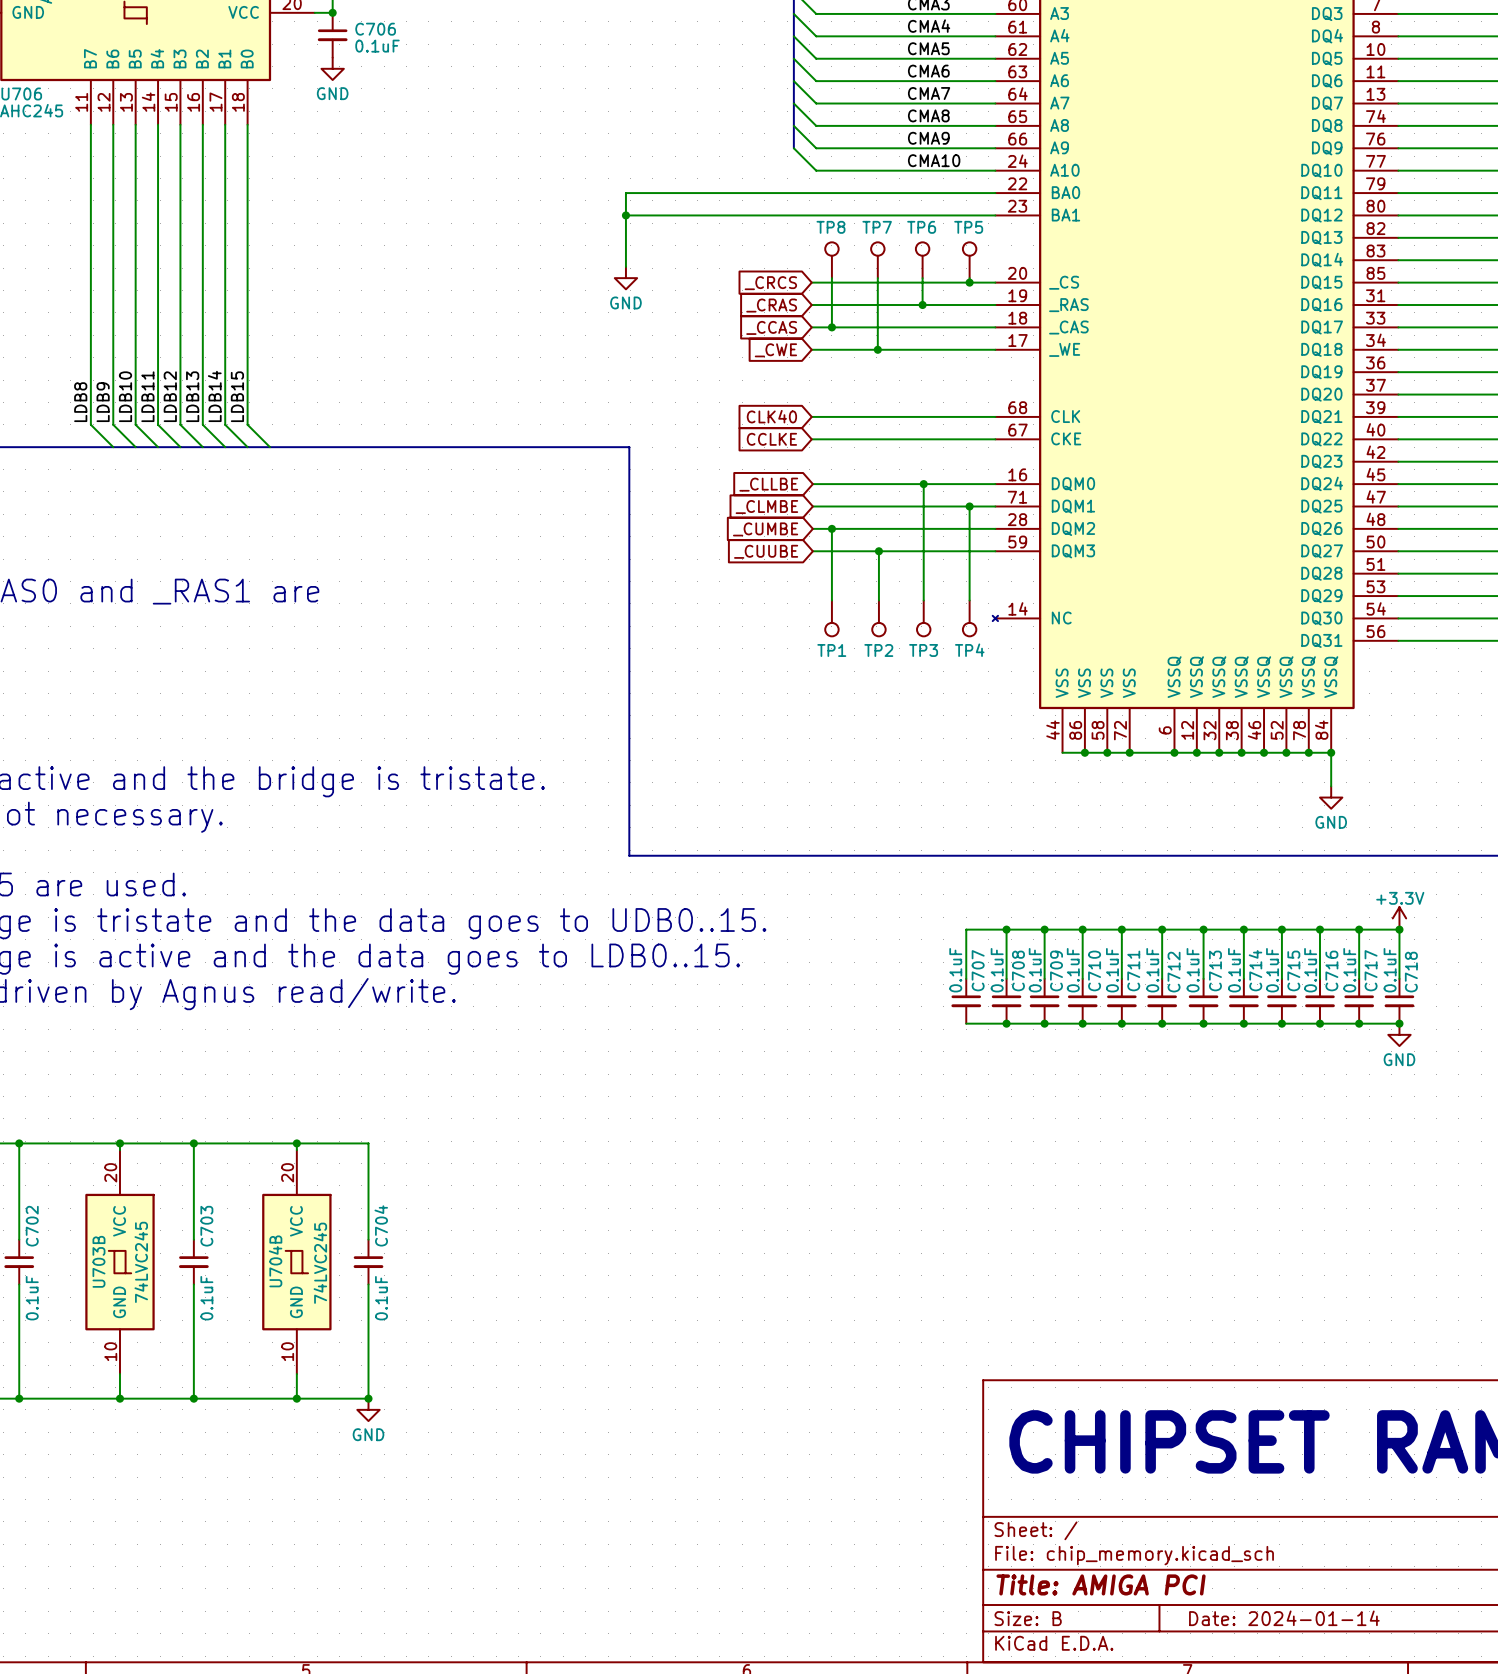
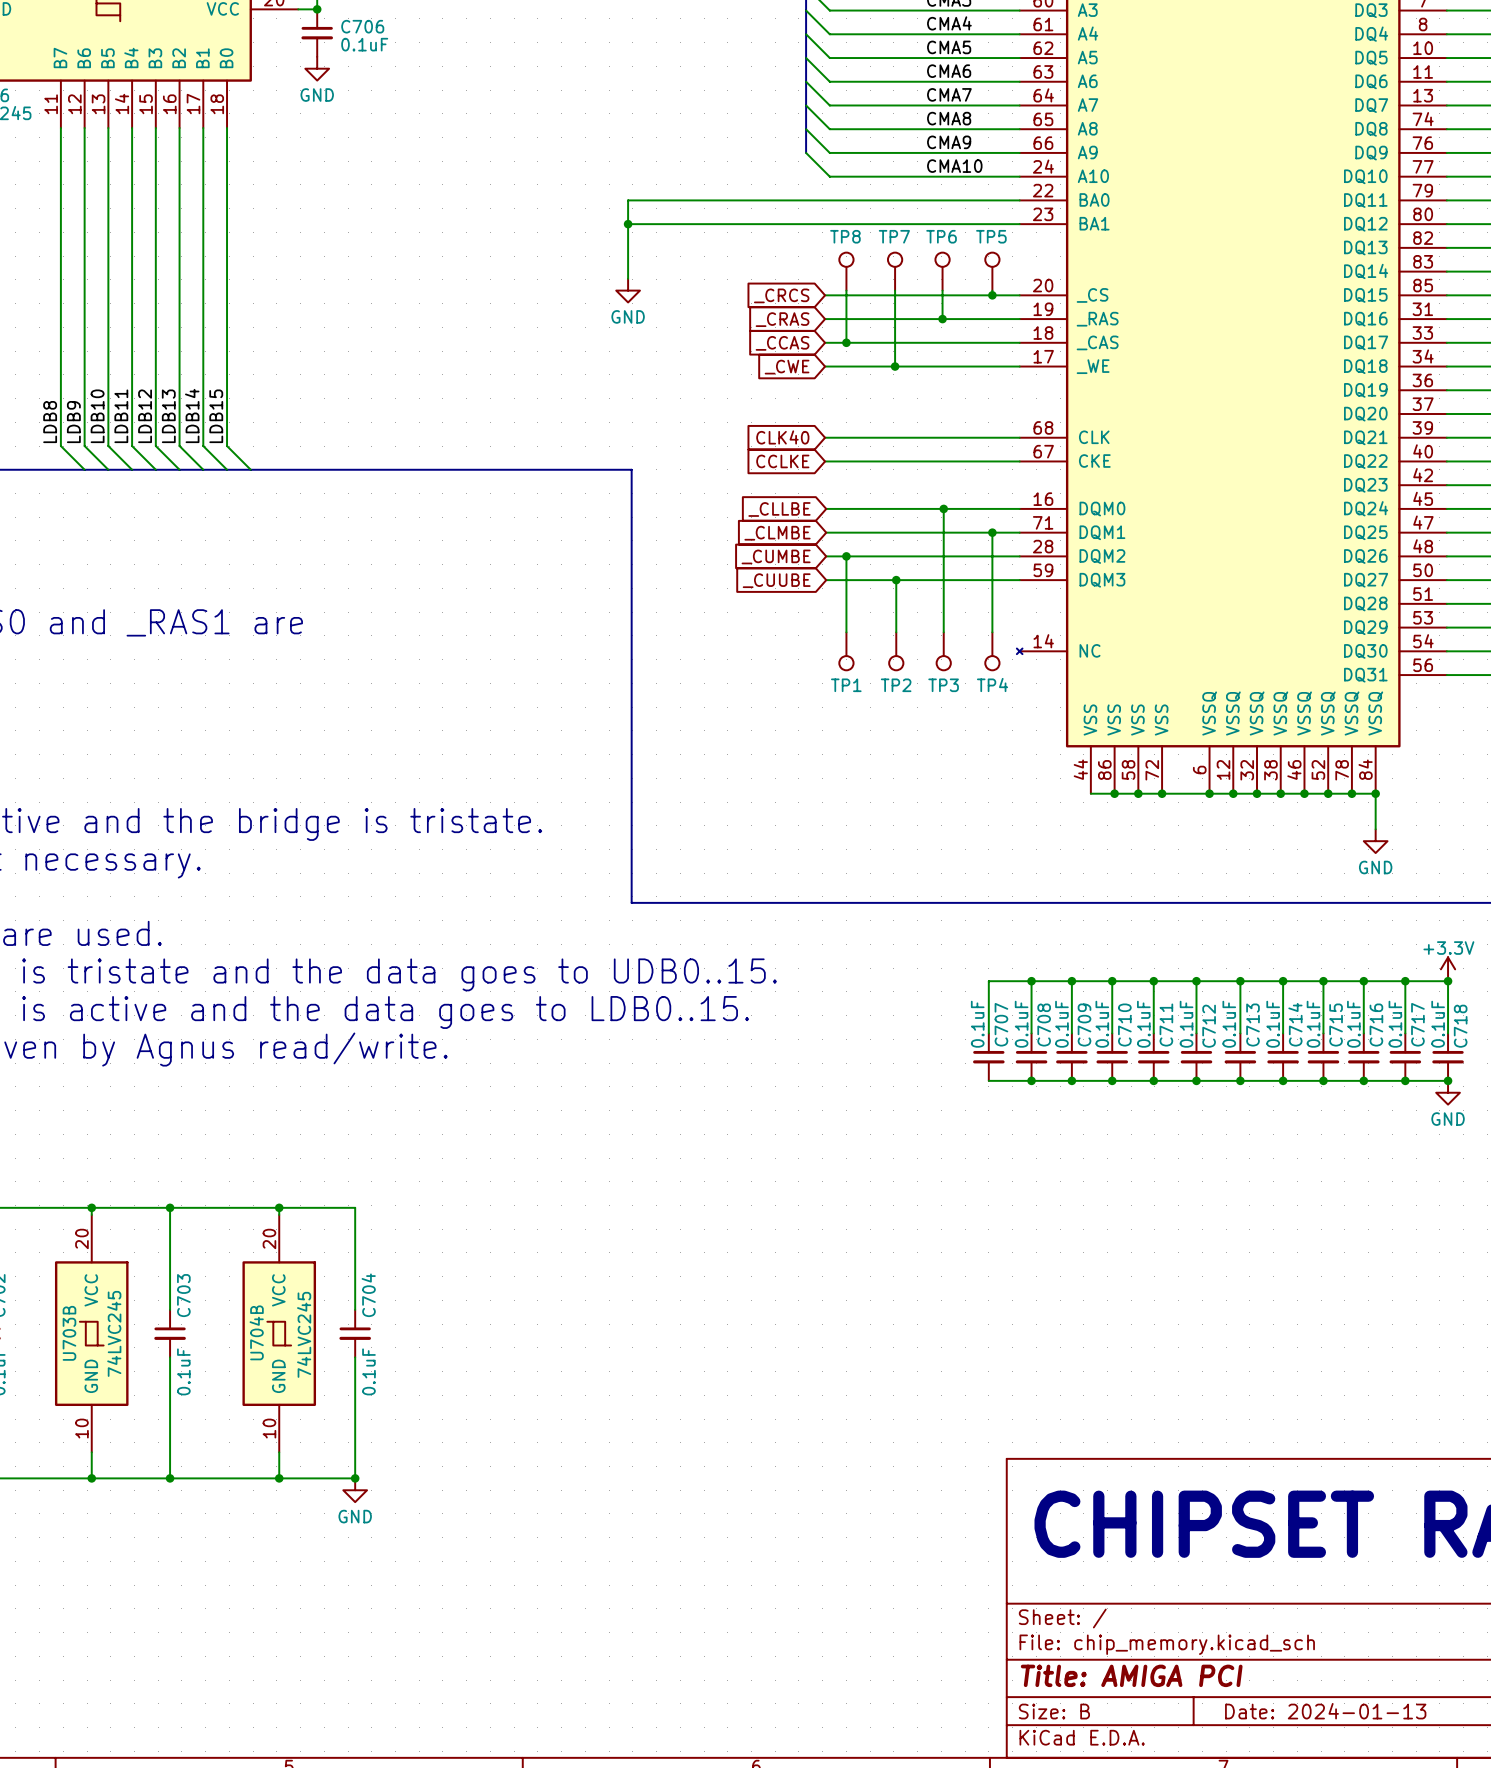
title block: Date: 2024-01-14 (1284, 1618) -> Date: 2024-01-13 (1325, 1711)

